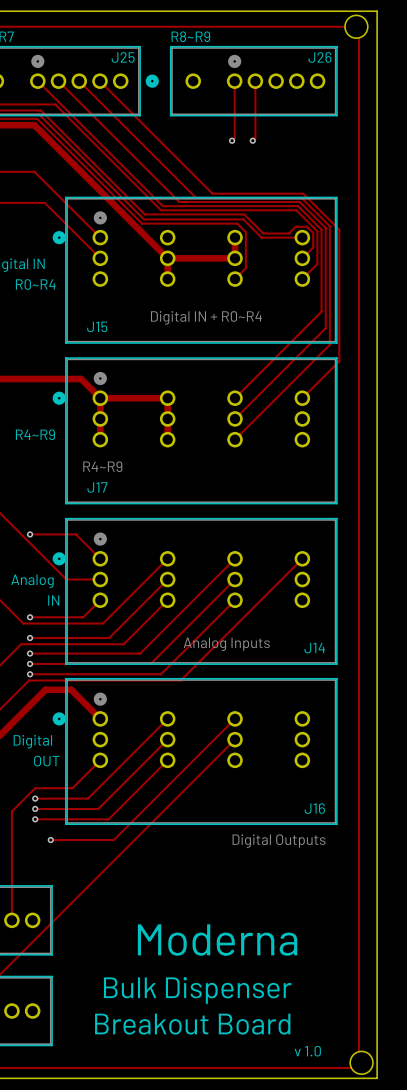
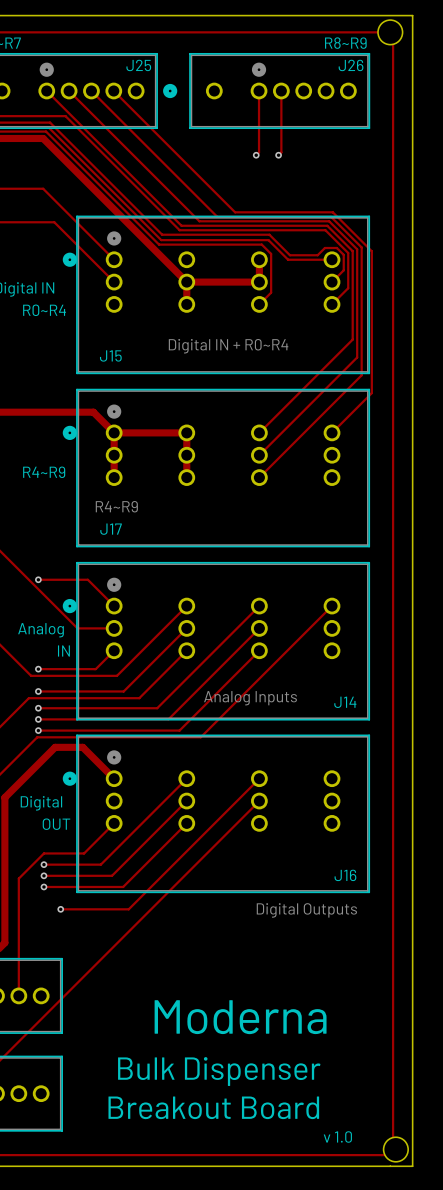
J26 value position: R8~R9 (190, 36) -> R8~R9 (345, 43)

